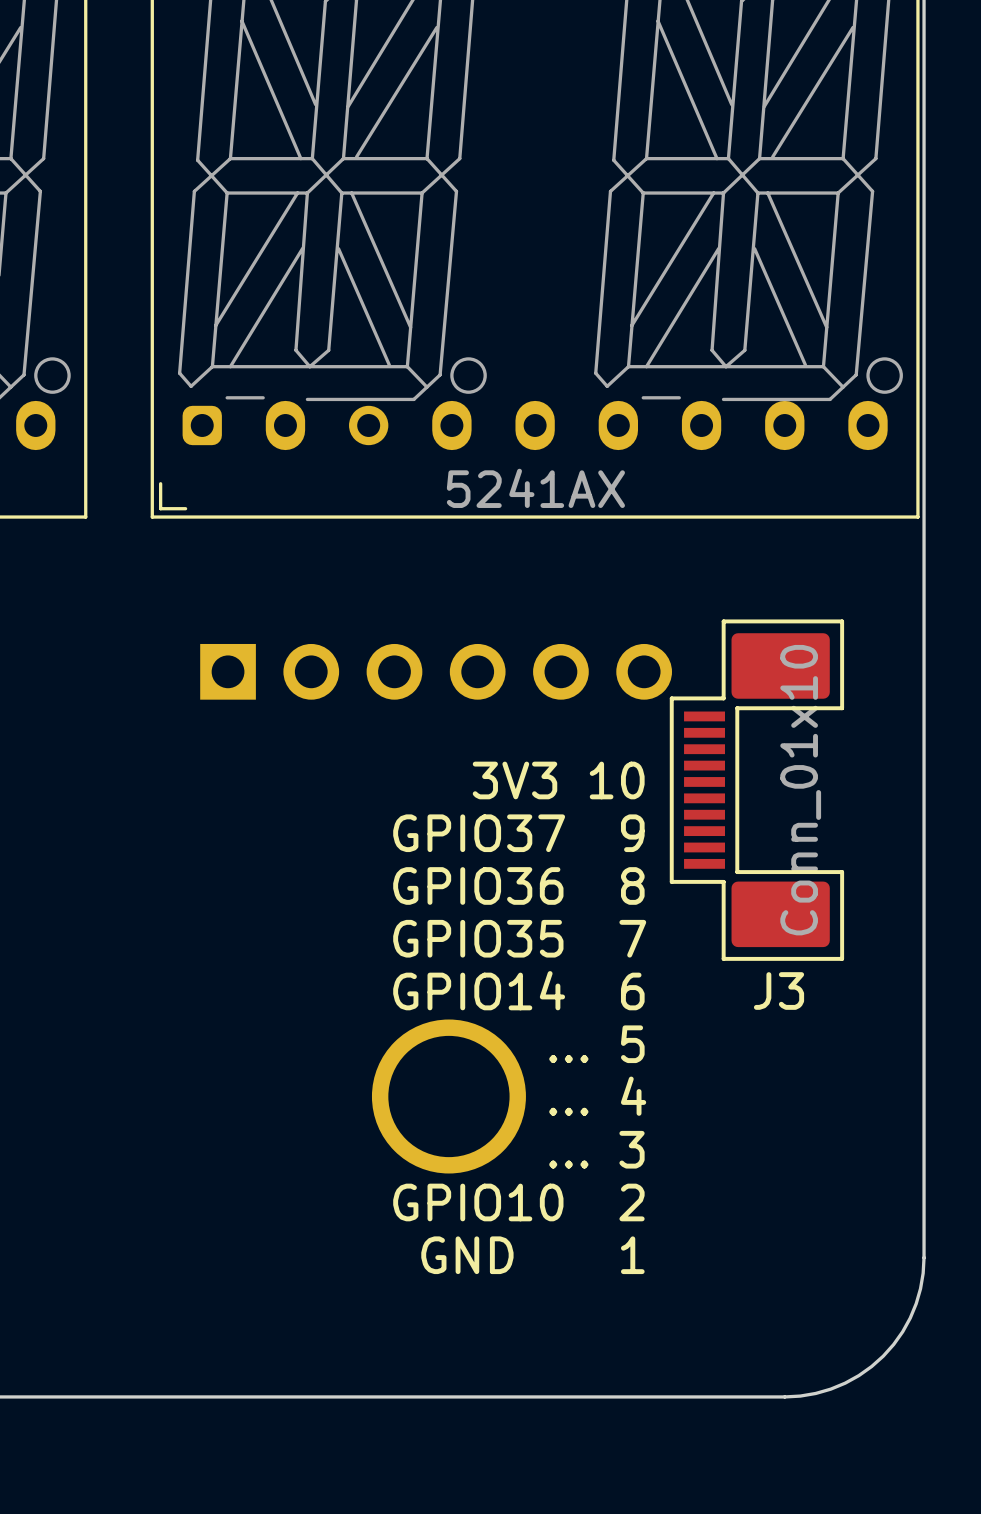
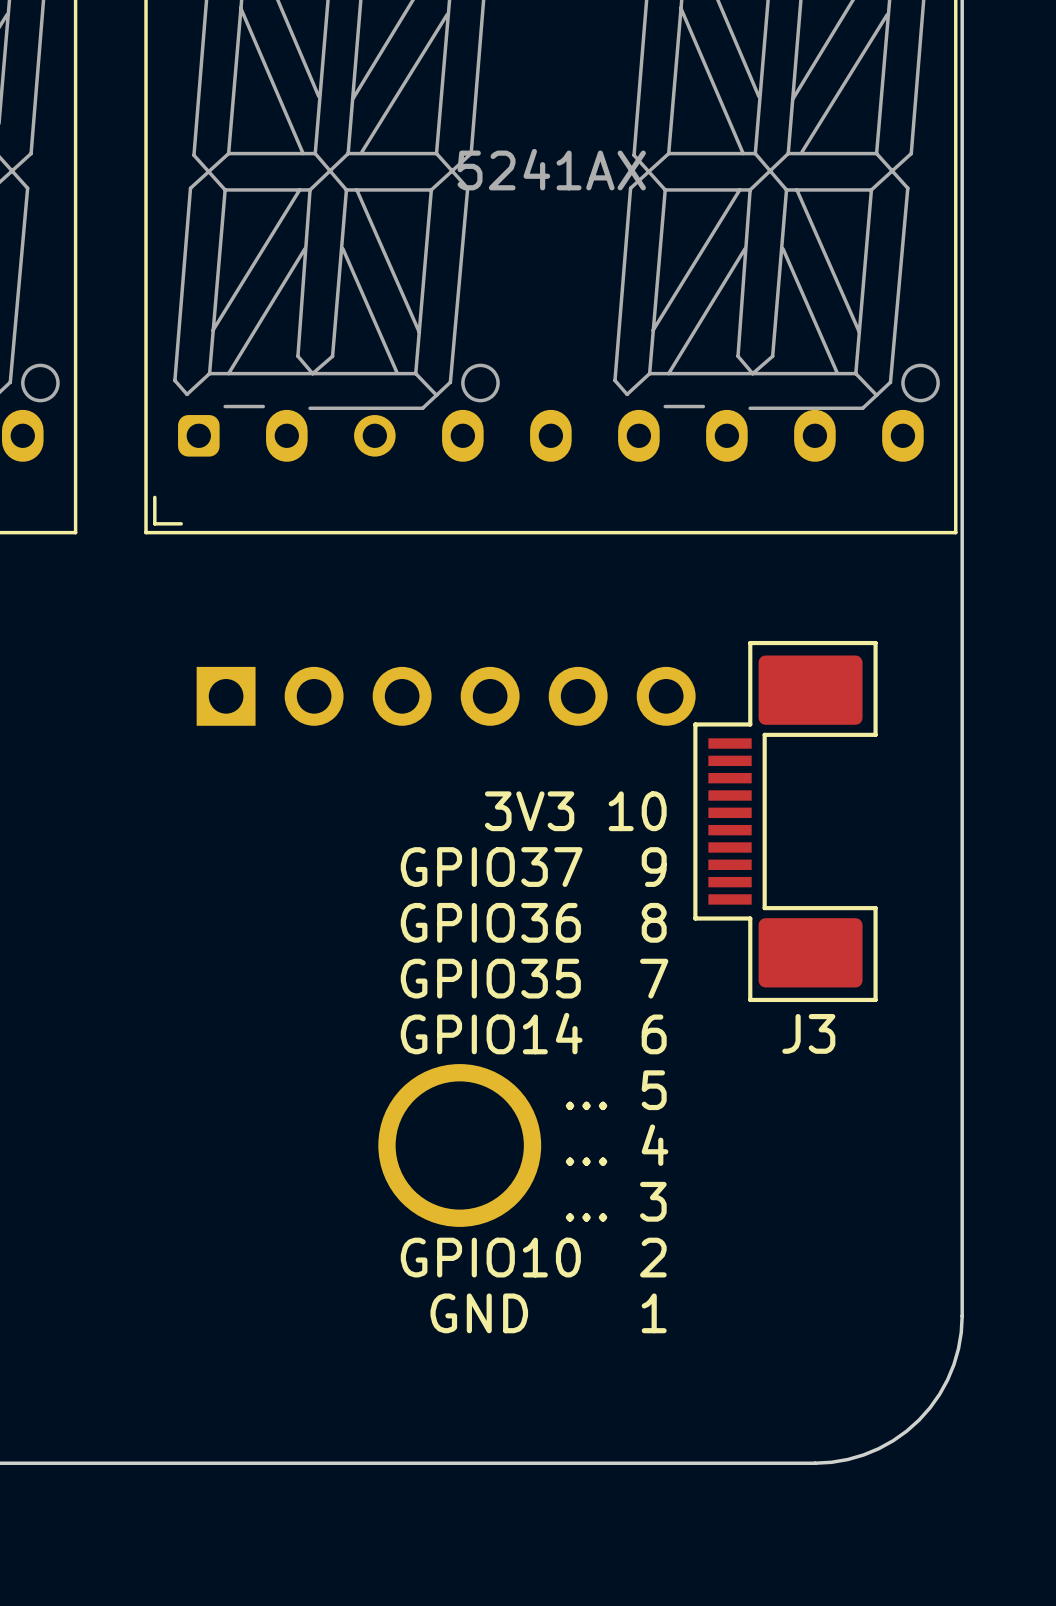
part value position: 5241AX (535, 488) -> 5241AX (551, 169)
J3 value: Conn_01x10 (800, 790) -> none

